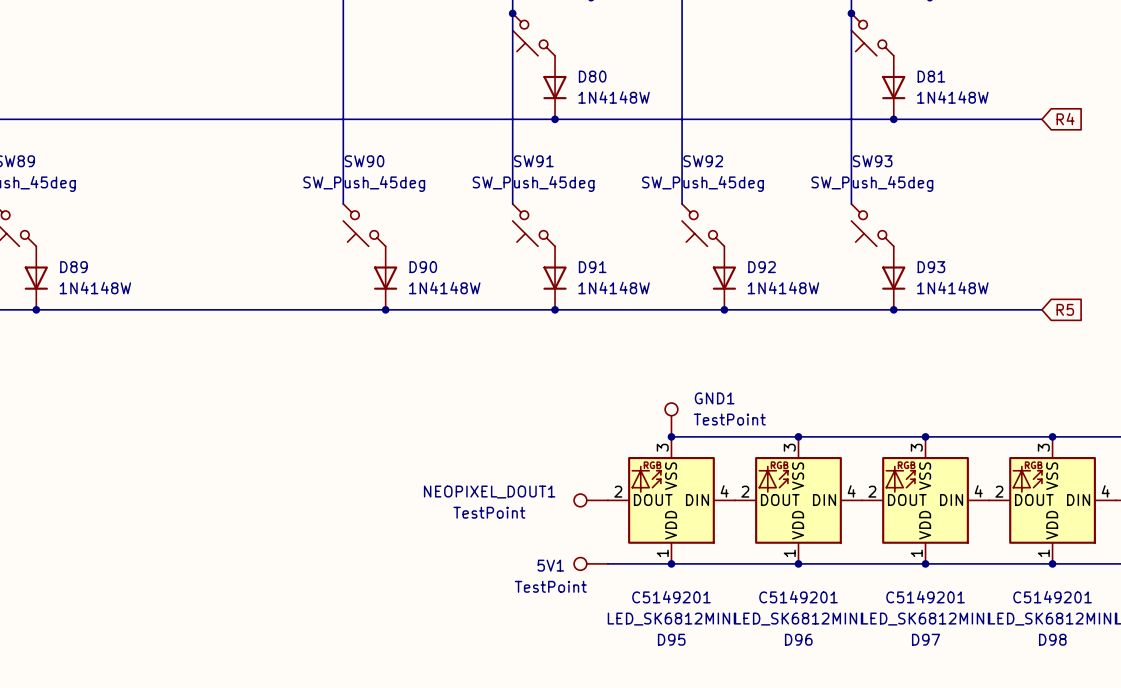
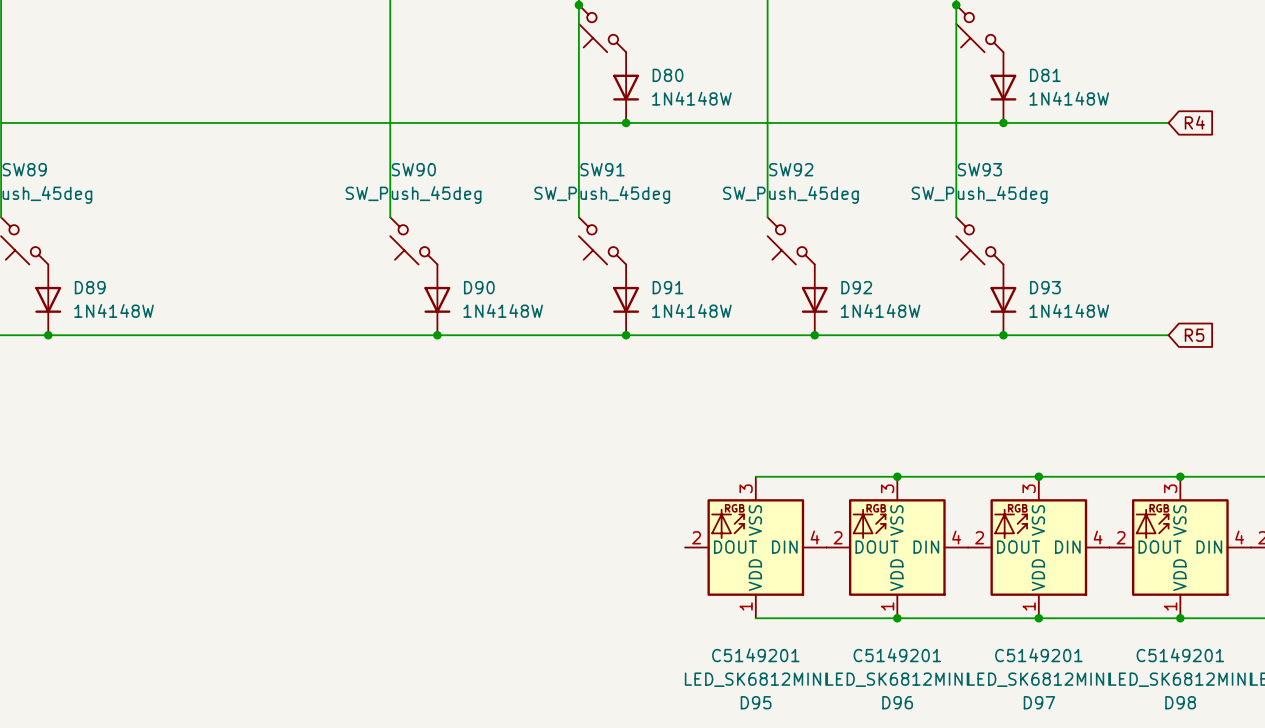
GND1: TestPoint (671, 419) -> none
junction: (671, 436) -> none
NEOPIXEL_DOUT1: TestPoint (591, 500) -> none
5V1: TestPoint (591, 563) -> none
wire: (607, 563) (671, 563) -> none
junction: (671, 563) -> none

